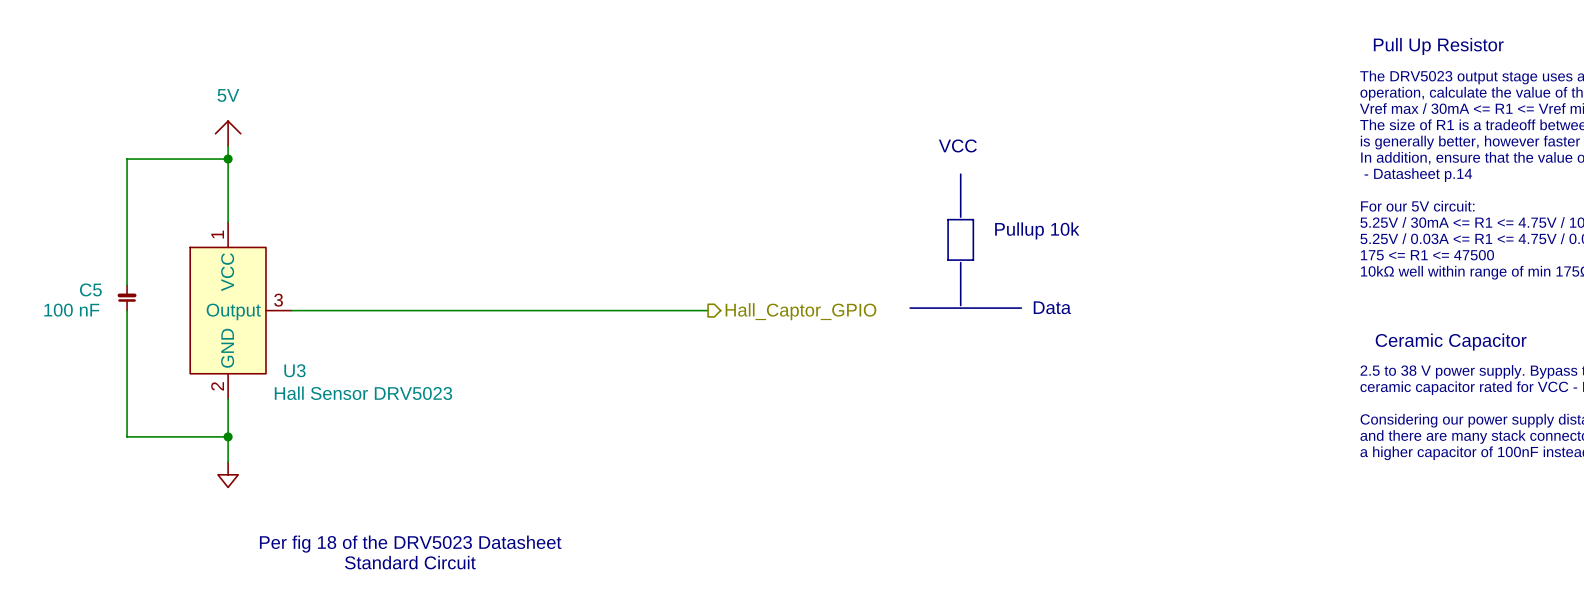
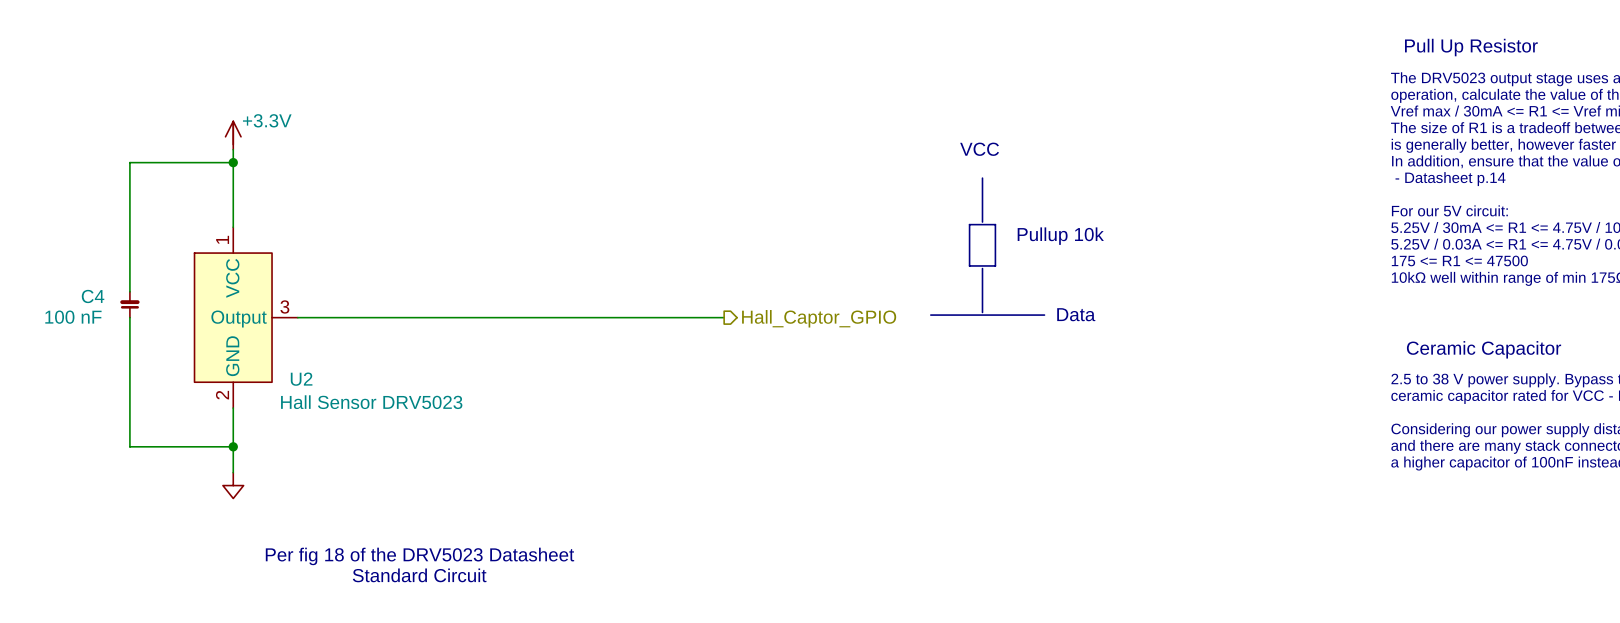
power symbol: 5V (228, 133) -> +3.3V (233, 135)
C5 name: C5 (90, 289) -> C4 (93, 296)
U3 name: U3 (294, 370) -> U2 (301, 379)

